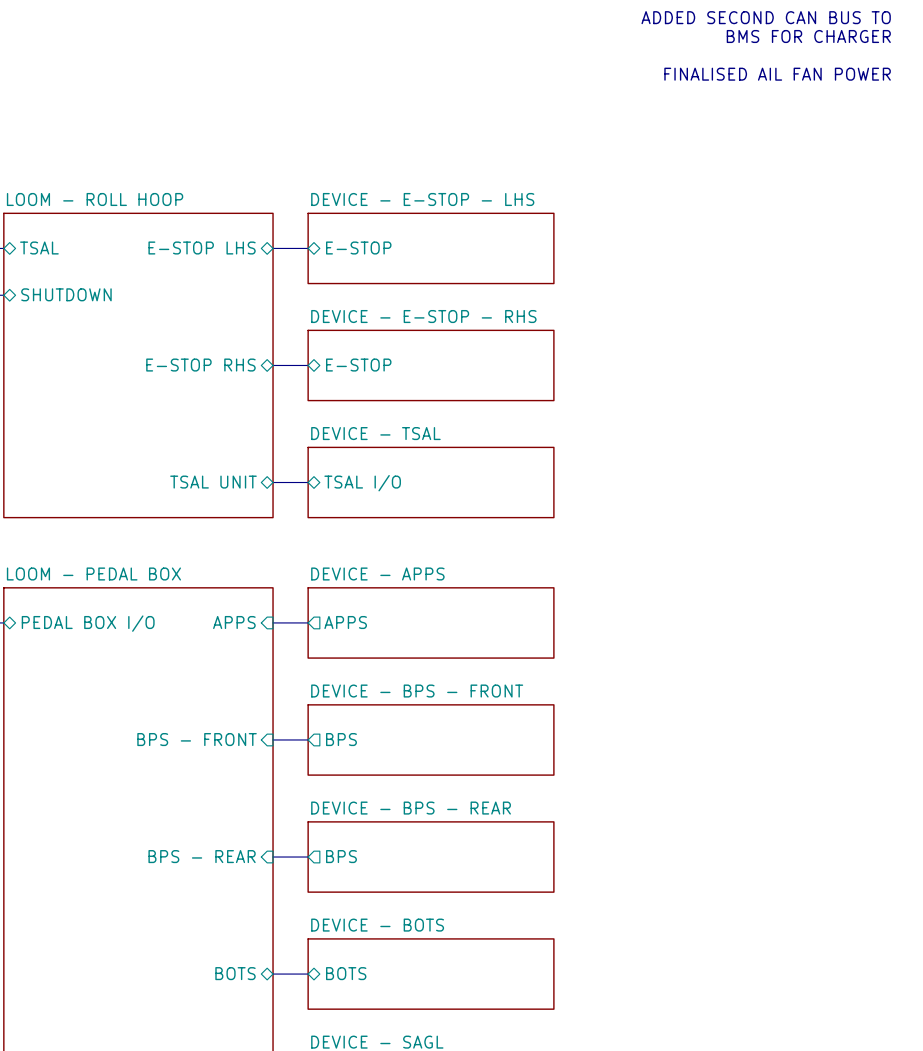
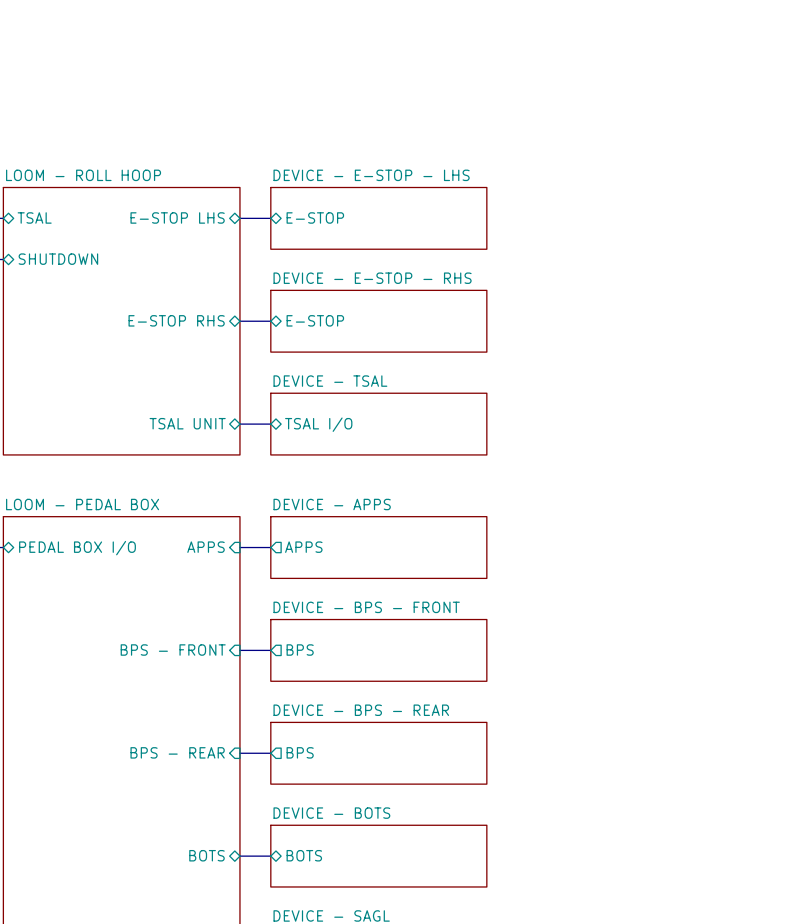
text: ADDED SECOND CAN BUS TO (766, 17) -> none
text: BMS FOR CHARGER (808, 36) -> none
text: FINALISED AIL FAN POWER (777, 74) -> none

